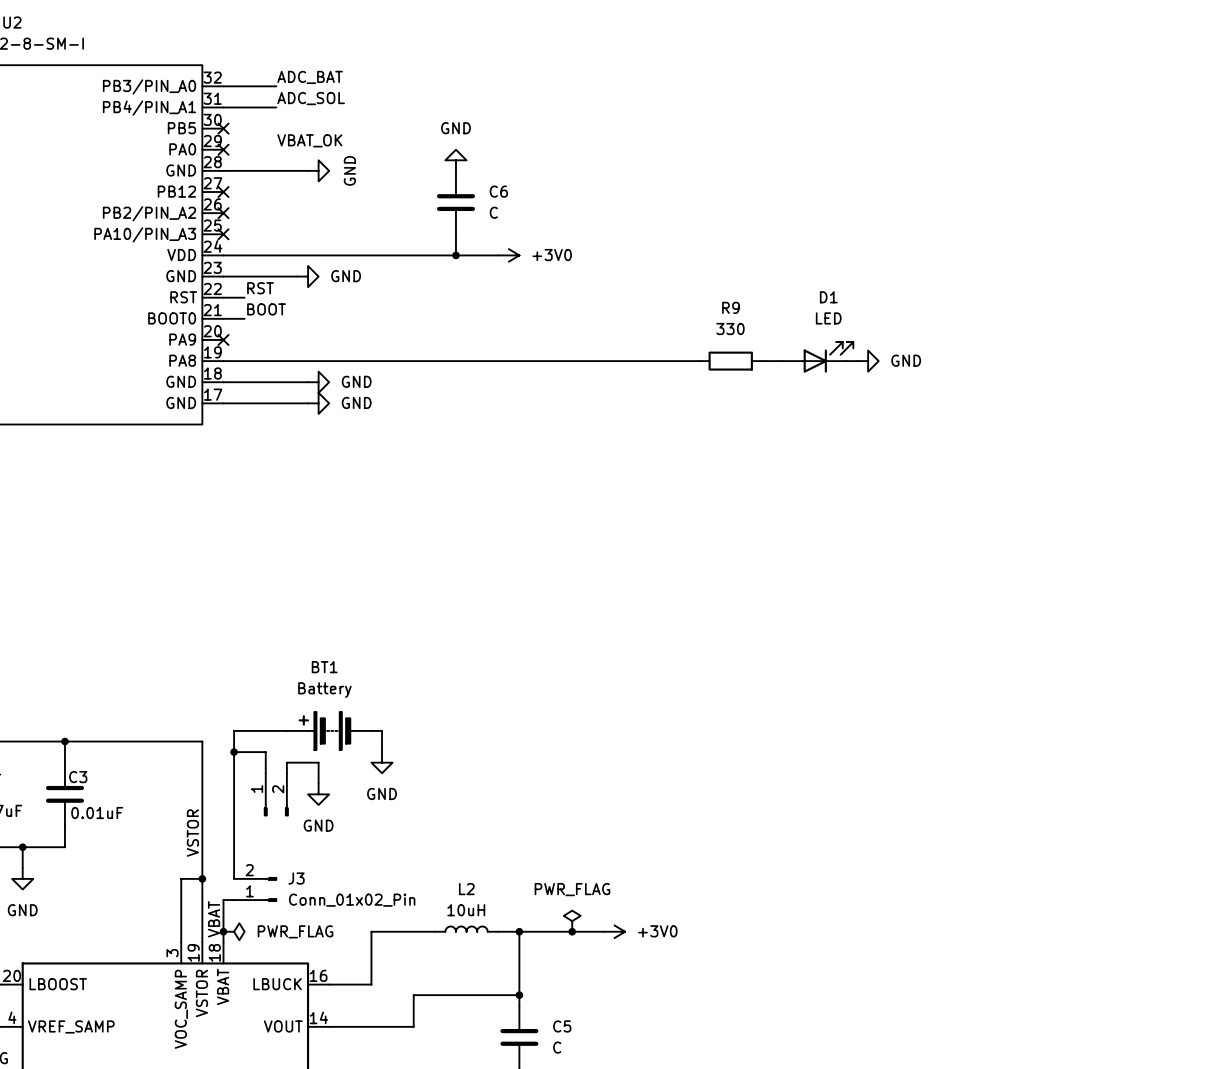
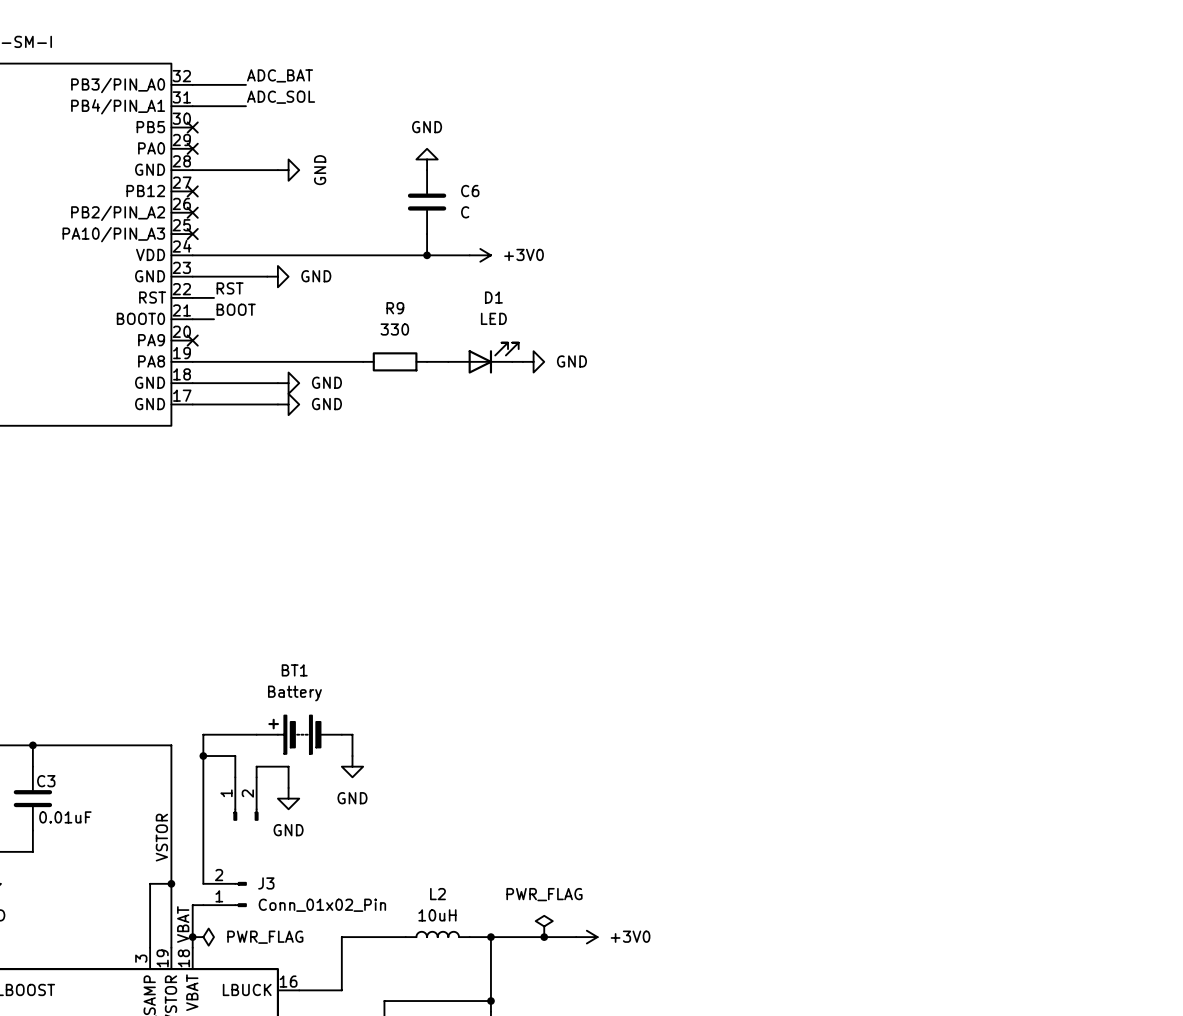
label: VBAT_OK (309, 140) -> none
D1 position: (818, 357) -> (483, 358)
wire: (392, 361) (455, 361) -> none
wire: (551, 361) (699, 361) -> none
power symbol: none -> GND (533, 361)
R9 position: (730, 361) -> (395, 361)
wire: (762, 361) (783, 361) -> none
wire: (846, 361) (857, 361) -> none
power symbol: GND (868, 361) -> none

